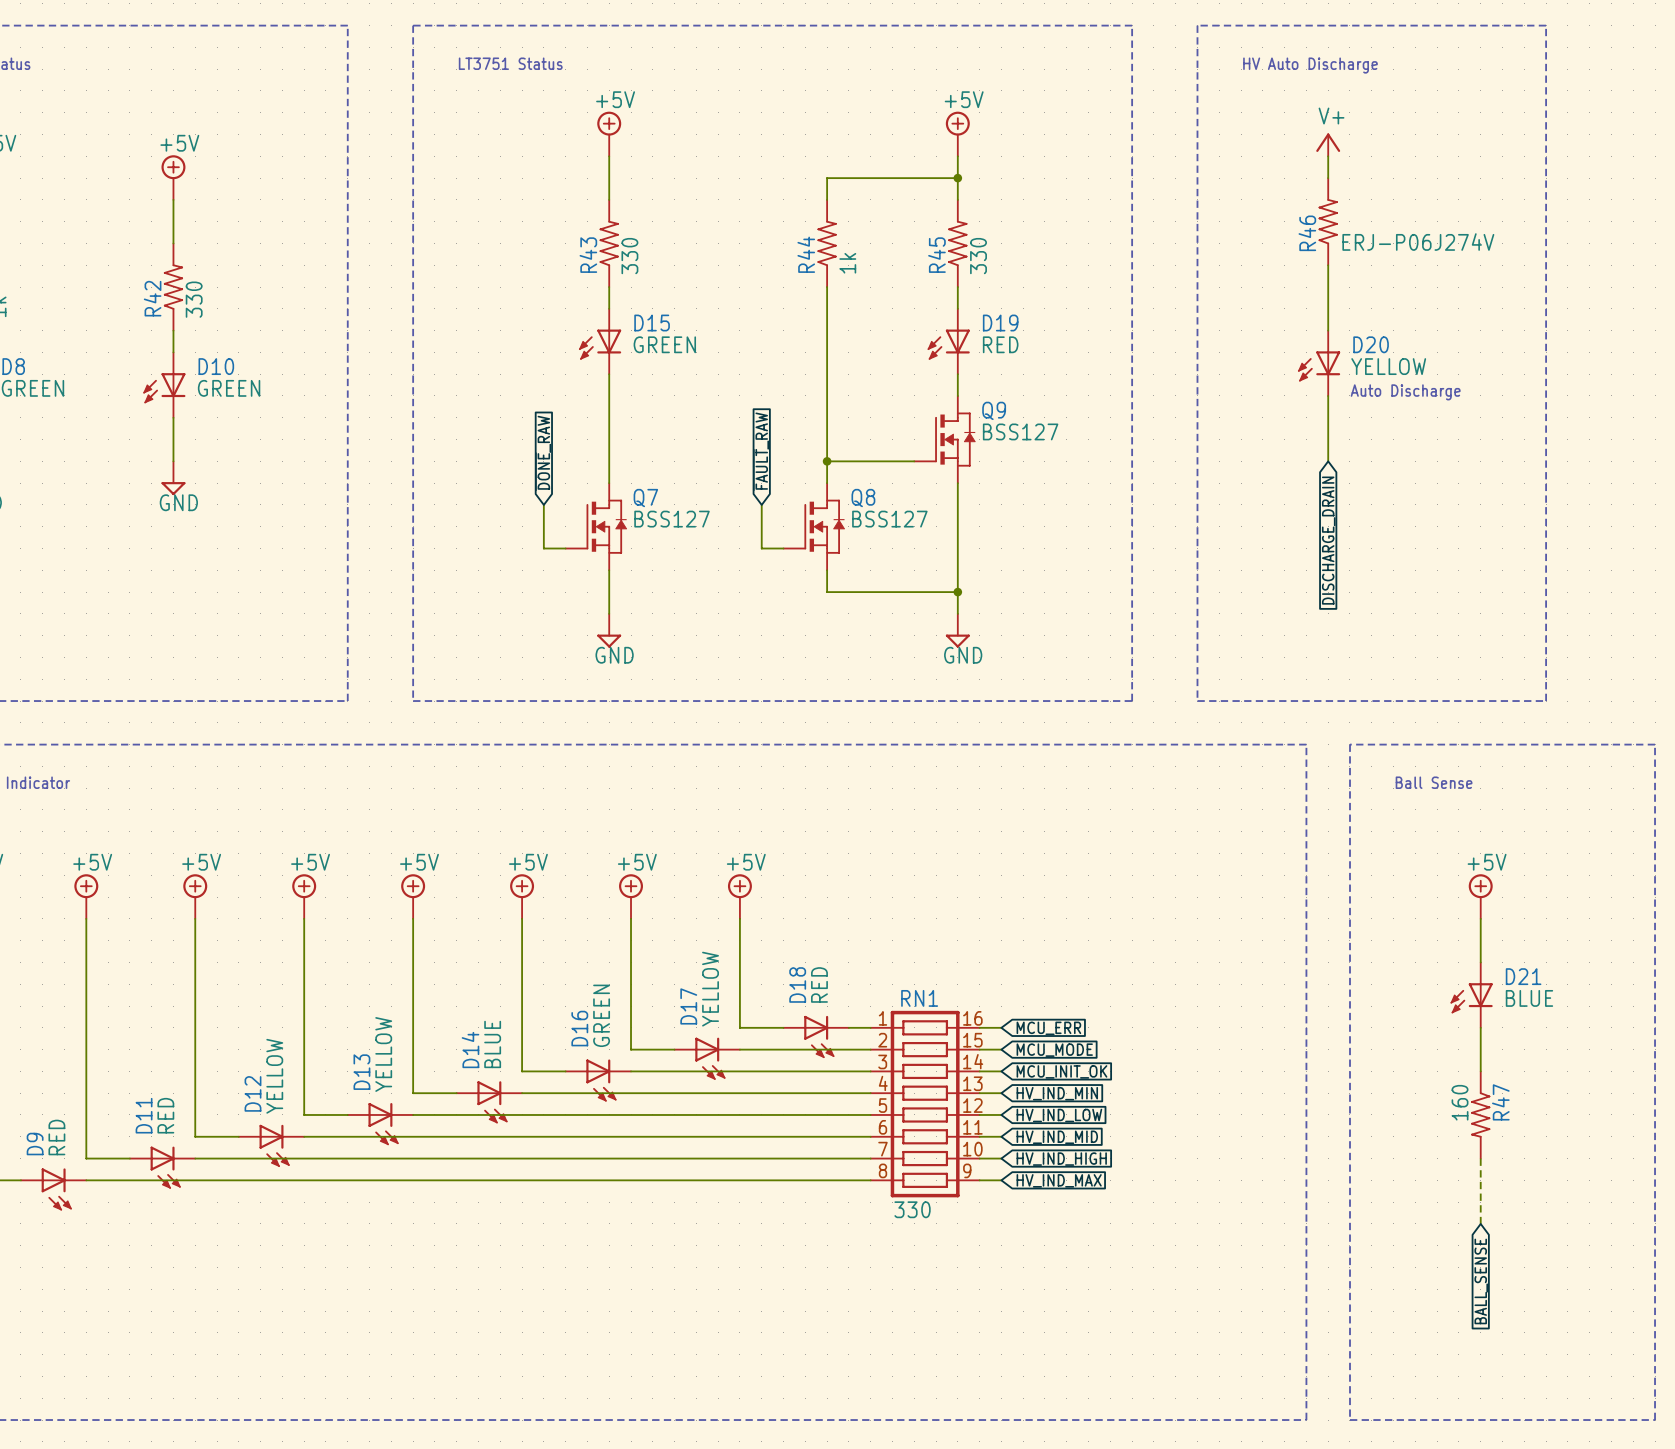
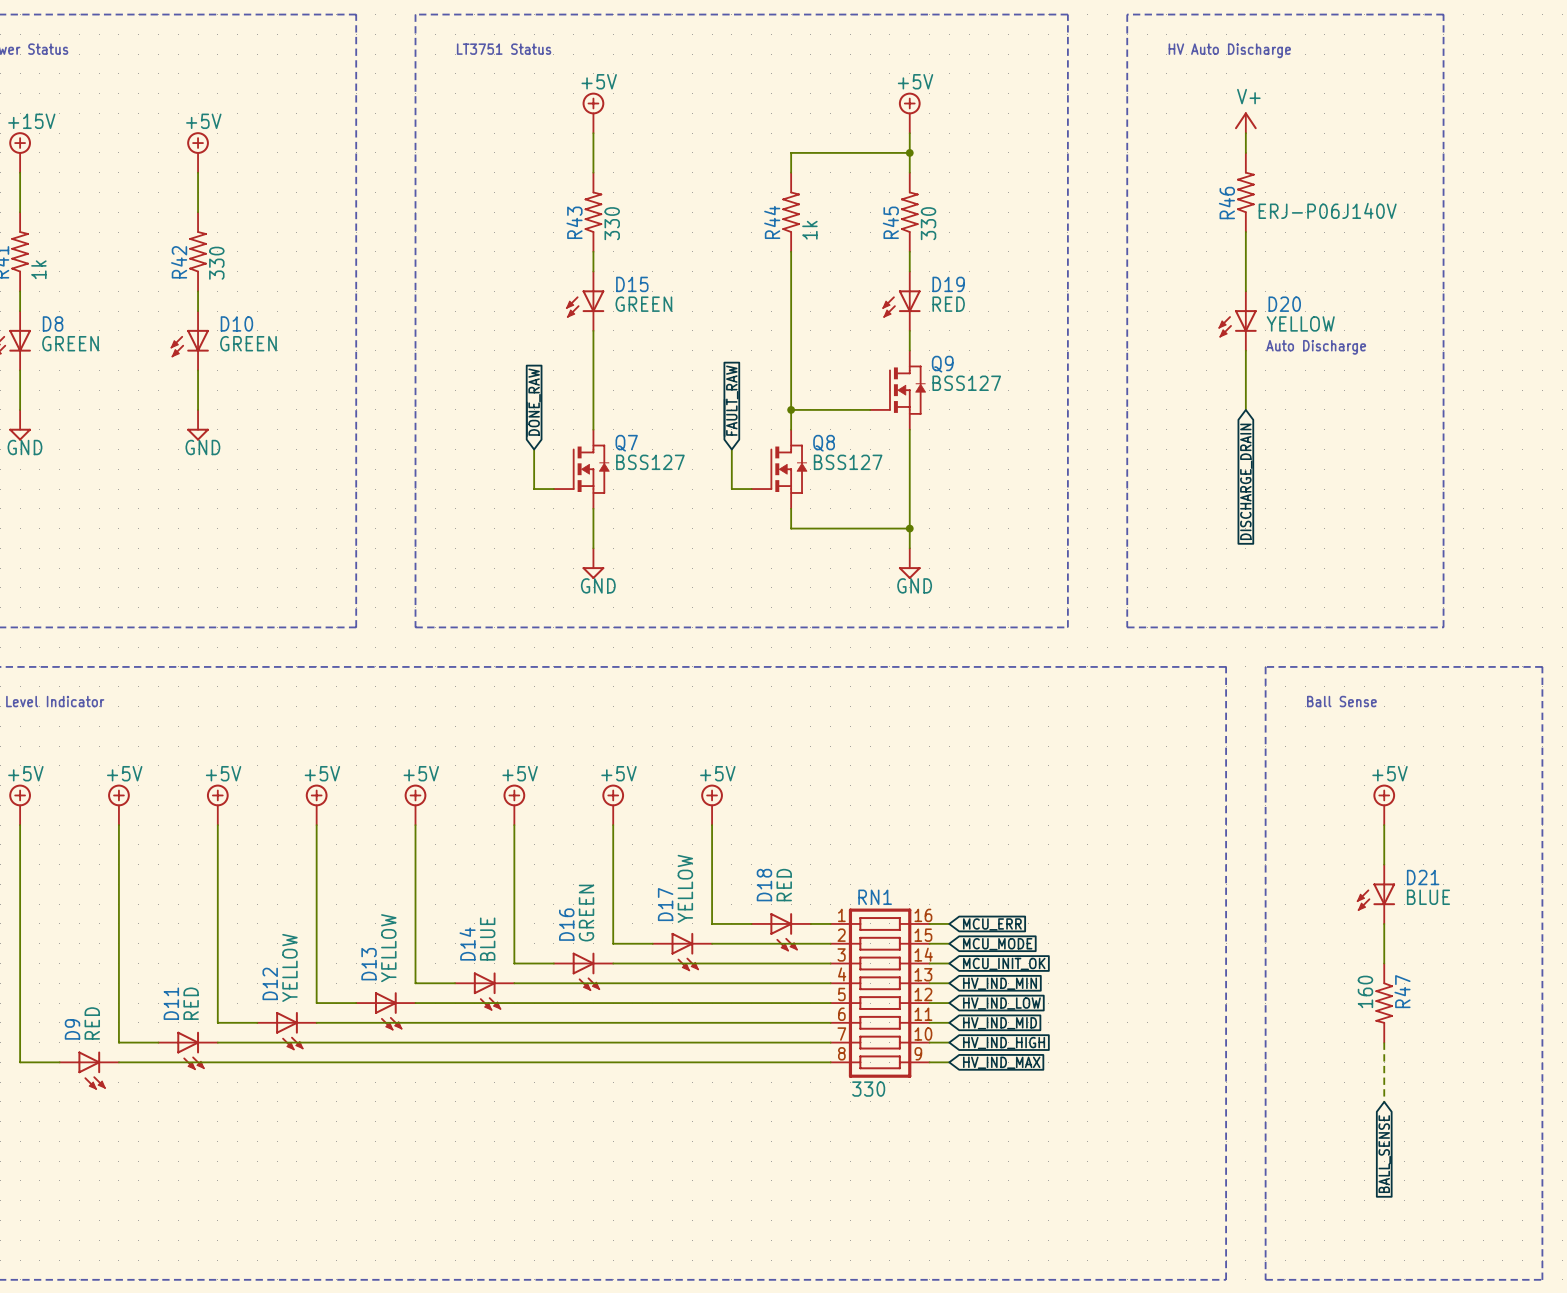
R46 value: ERJ-P06J274V (1418, 242) -> ERJ-P06J140V (1327, 210)

